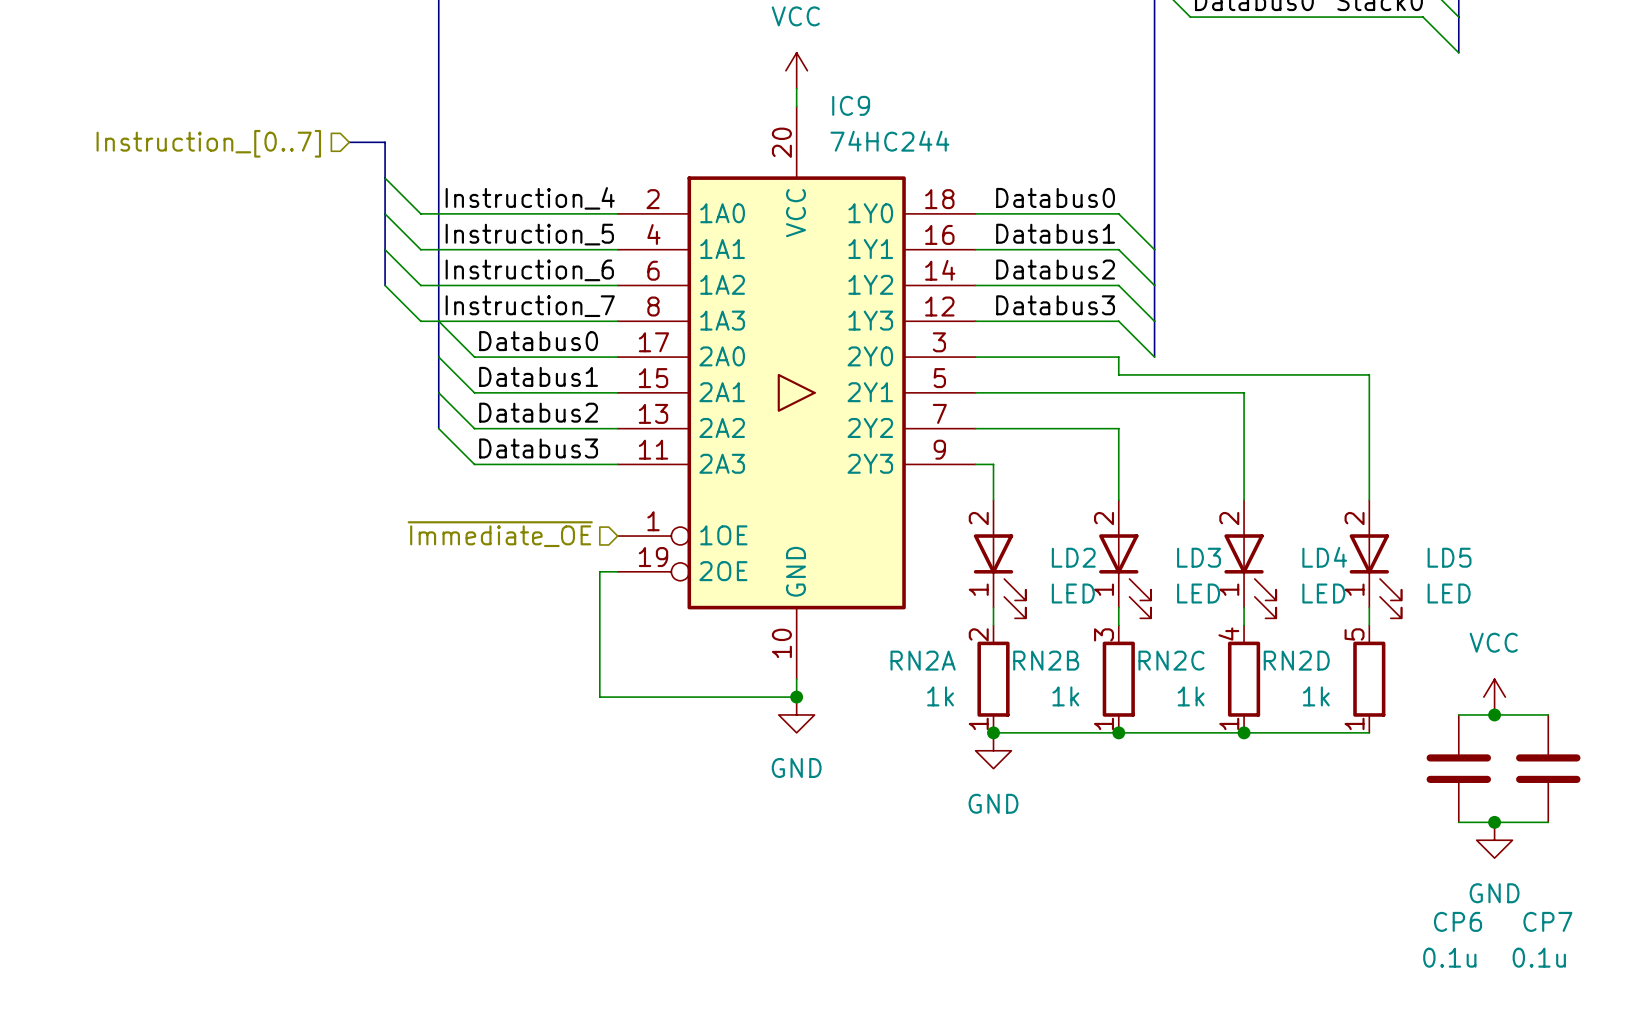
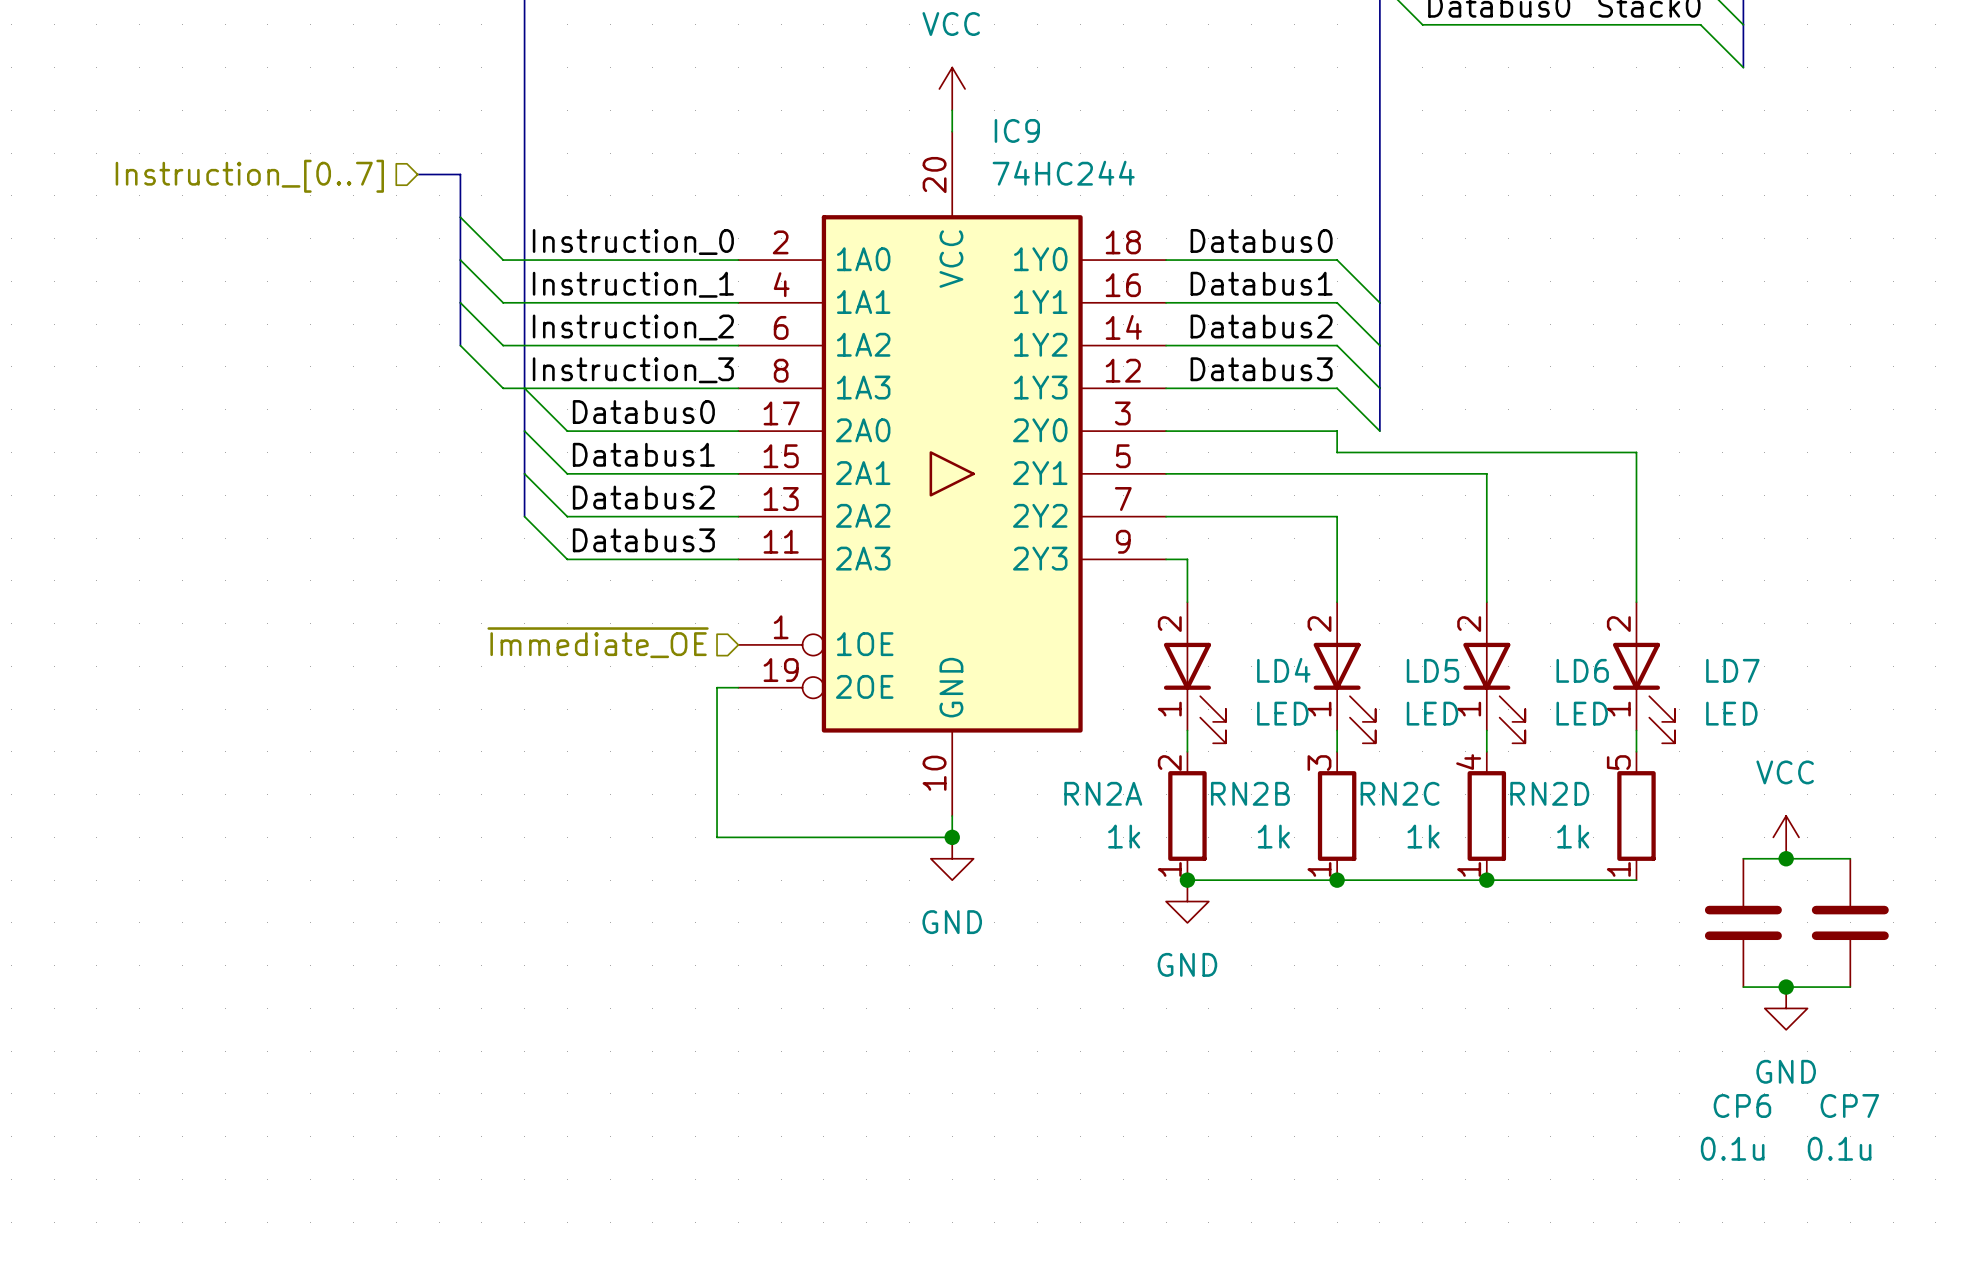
label: Instruction_4 (530, 198) -> Instruction_0 (633, 241)
label: Instruction_5 (529, 234) -> Instruction_1 (633, 284)
label: Instruction_6 (529, 270) -> Instruction_2 (633, 327)
label: Instruction_7 (530, 306) -> Instruction_3 (633, 370)
LD2 name: LD2 (1073, 557) -> LD4 (1283, 670)
LD3 name: LD3 (1199, 557) -> LD5 (1433, 670)
LD4 name: LD4 (1324, 557) -> LD6 (1582, 670)
LD5 name: LD5 (1449, 557) -> LD7 (1732, 670)

